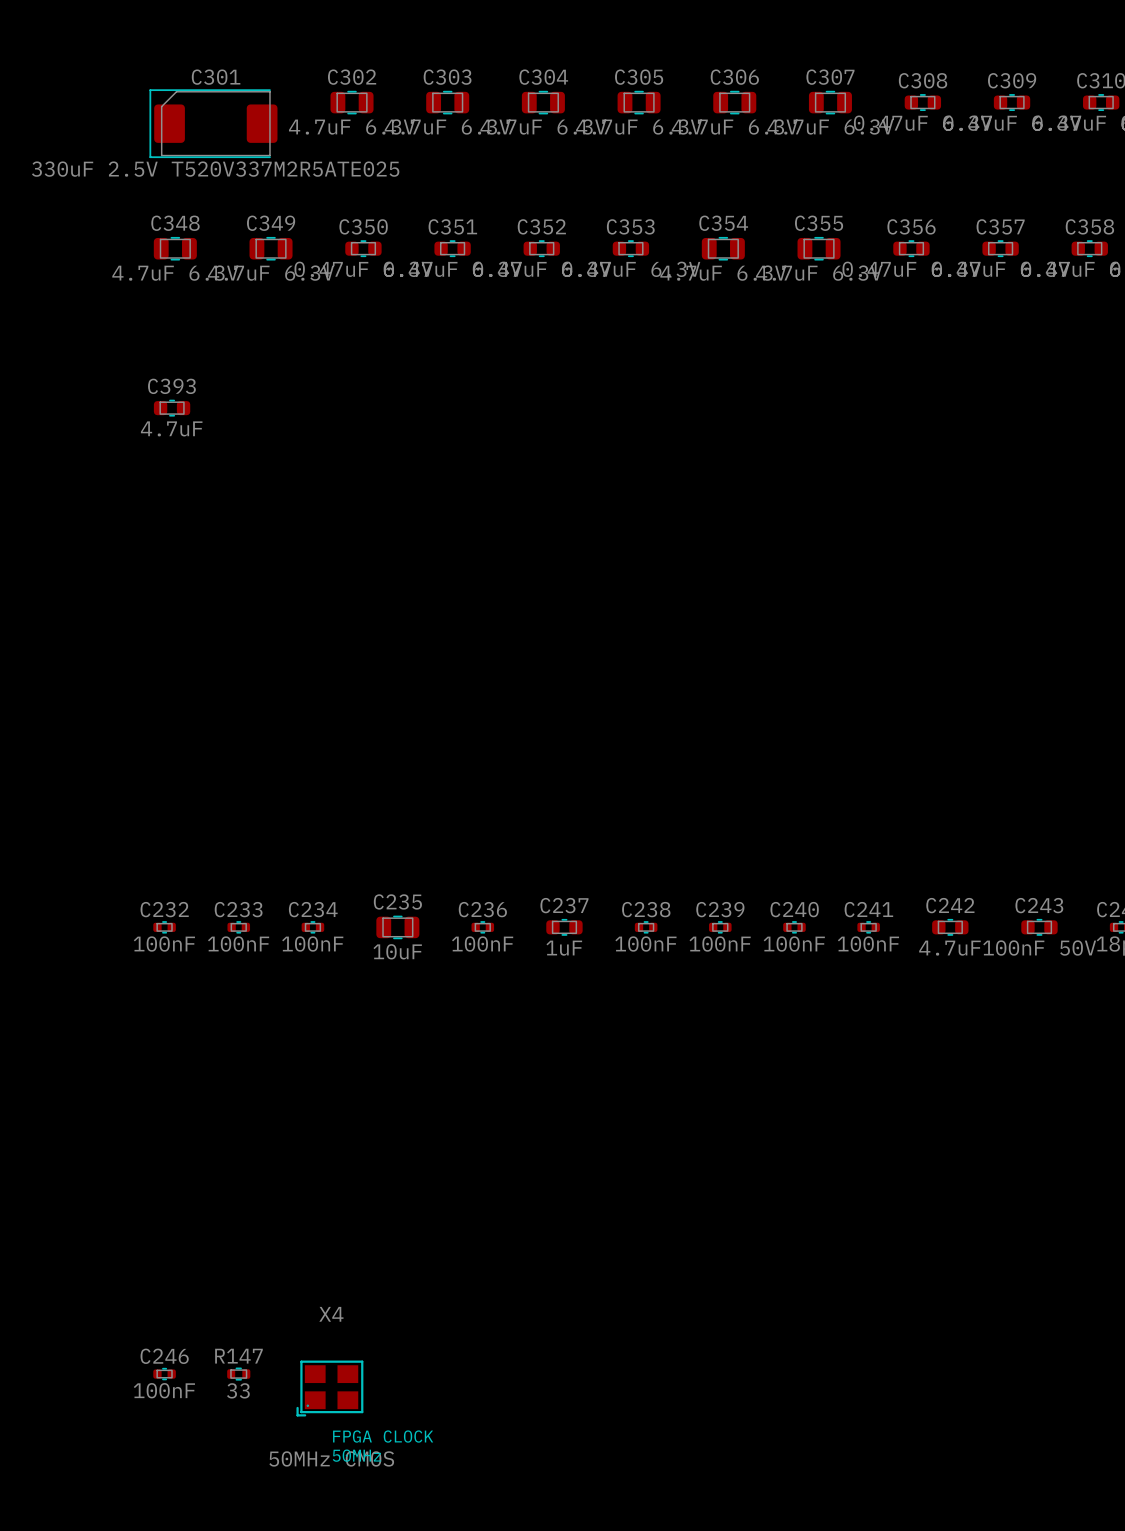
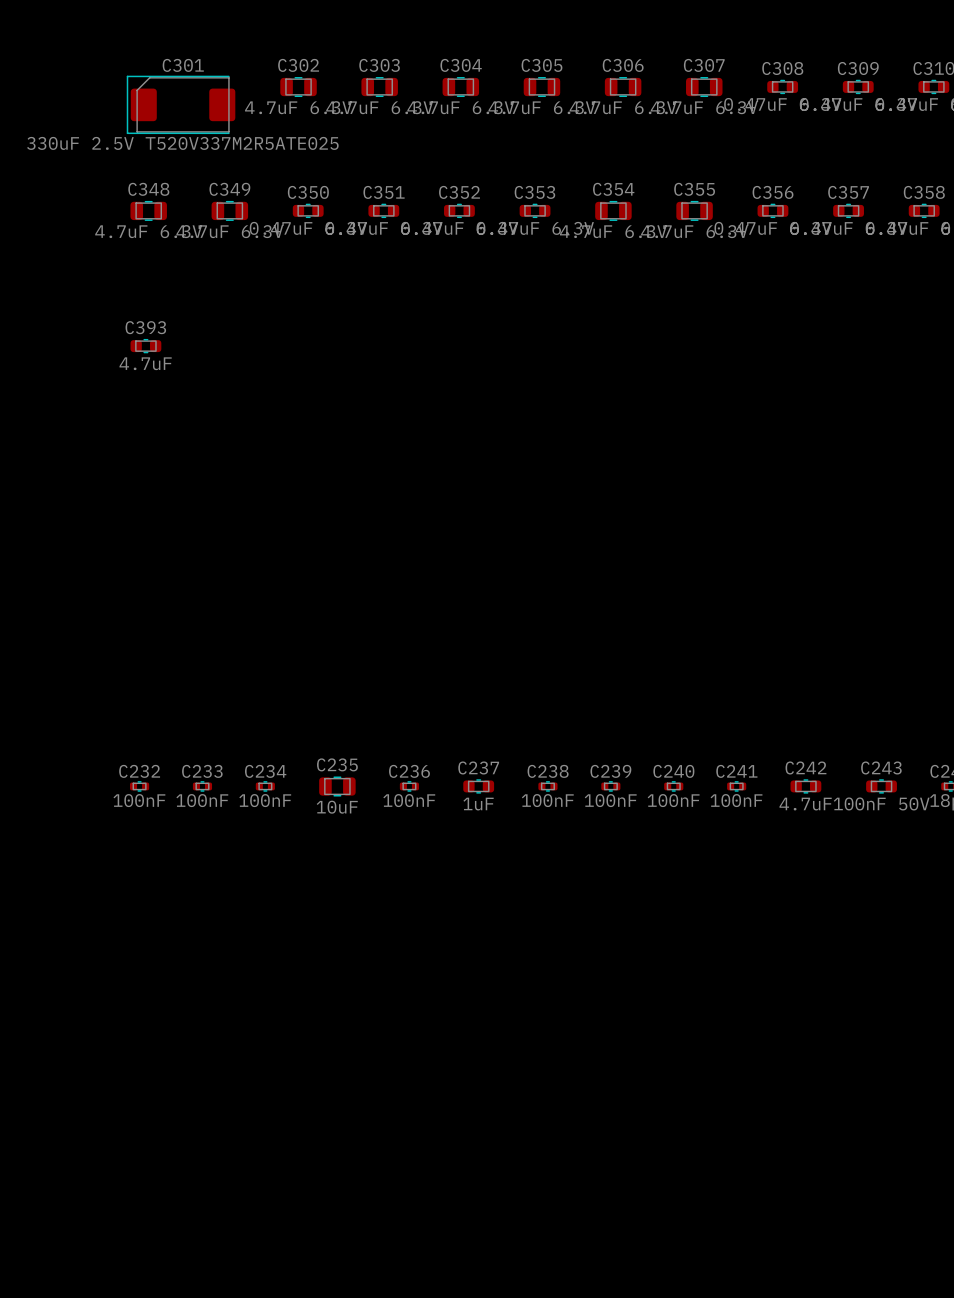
C246: 100nF (164, 1374) -> none
R147: 33 (238, 1374) -> none
X4: 50MHz CMOS (329, 1388) -> none

